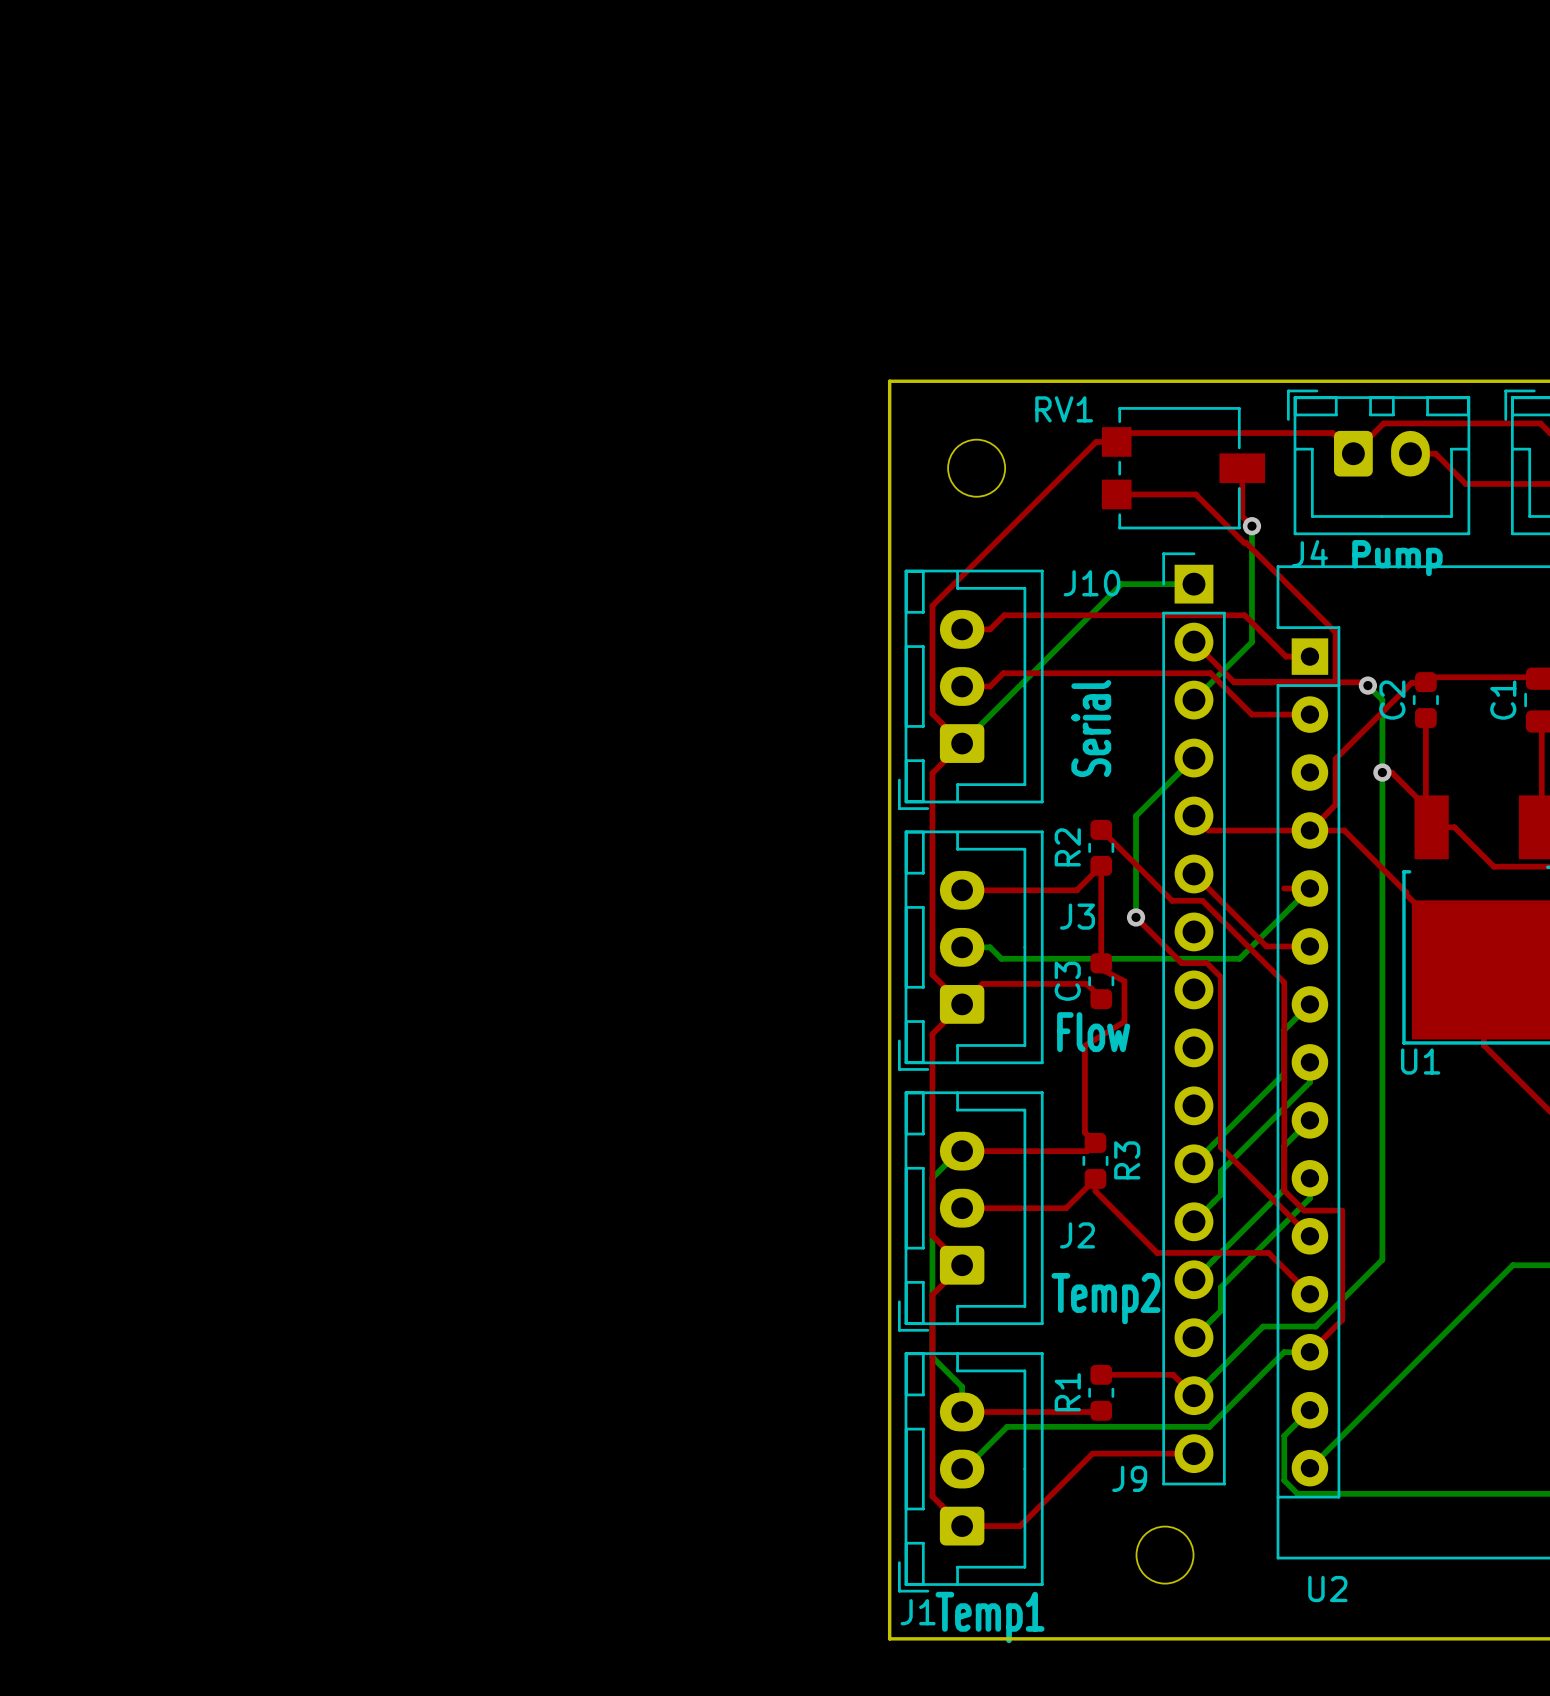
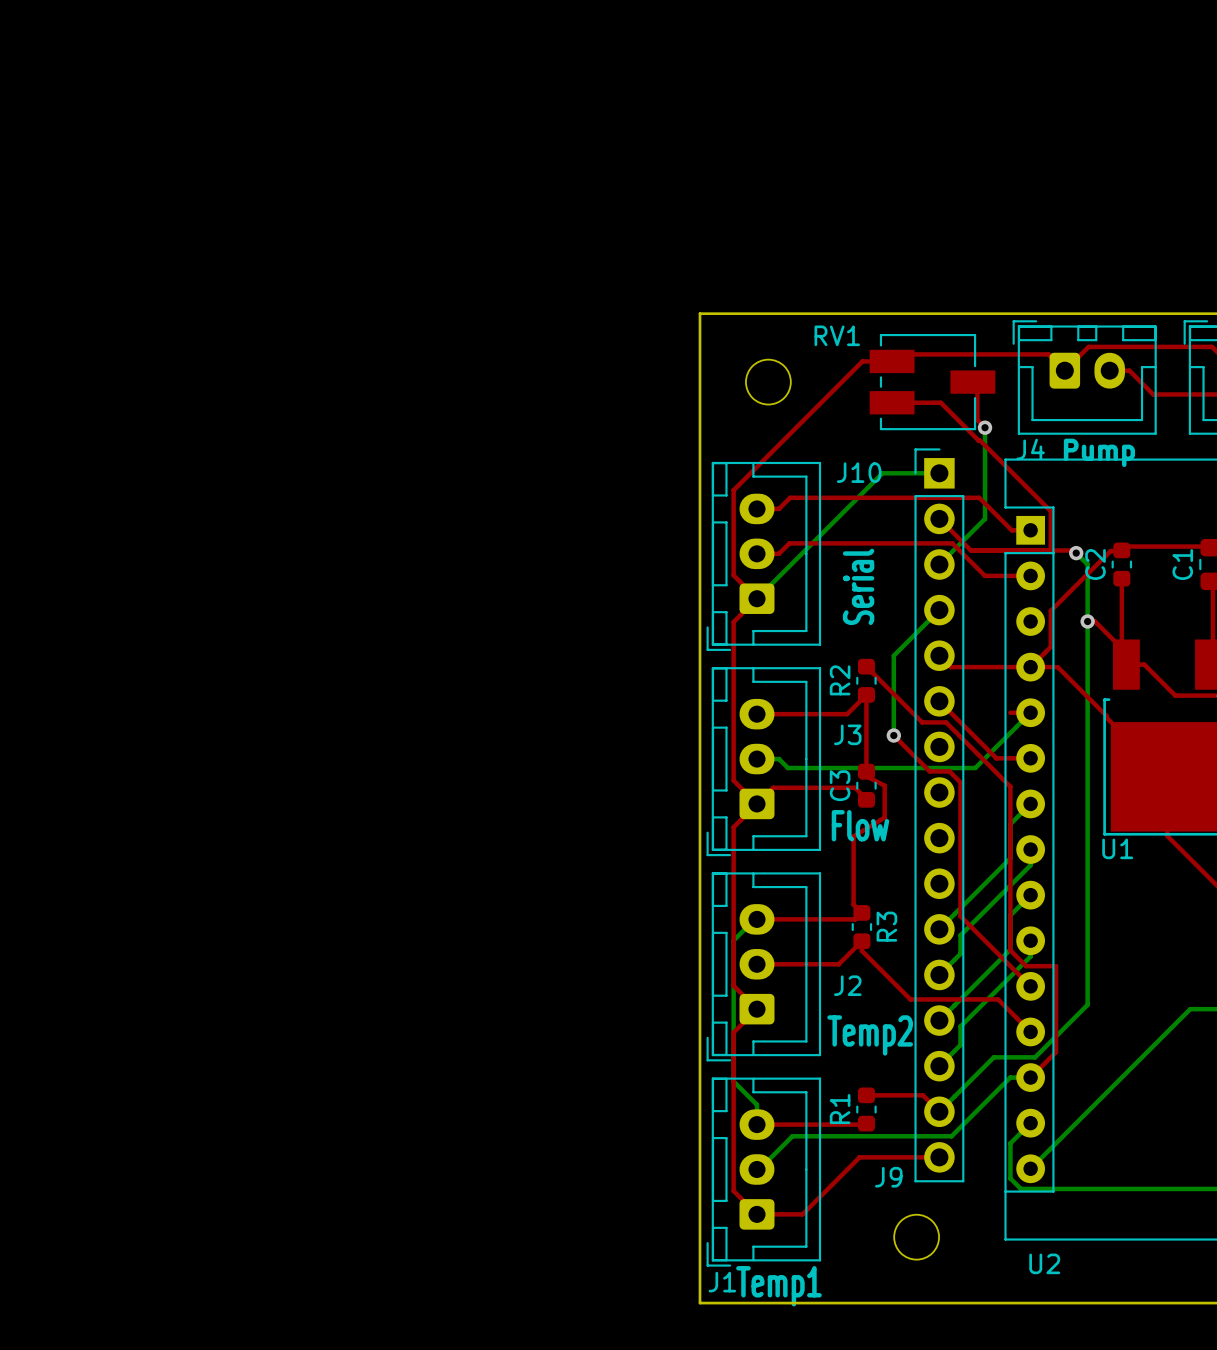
RV1 footprint: [1101, 407, 1266, 530] -> [869, 333, 996, 431]

